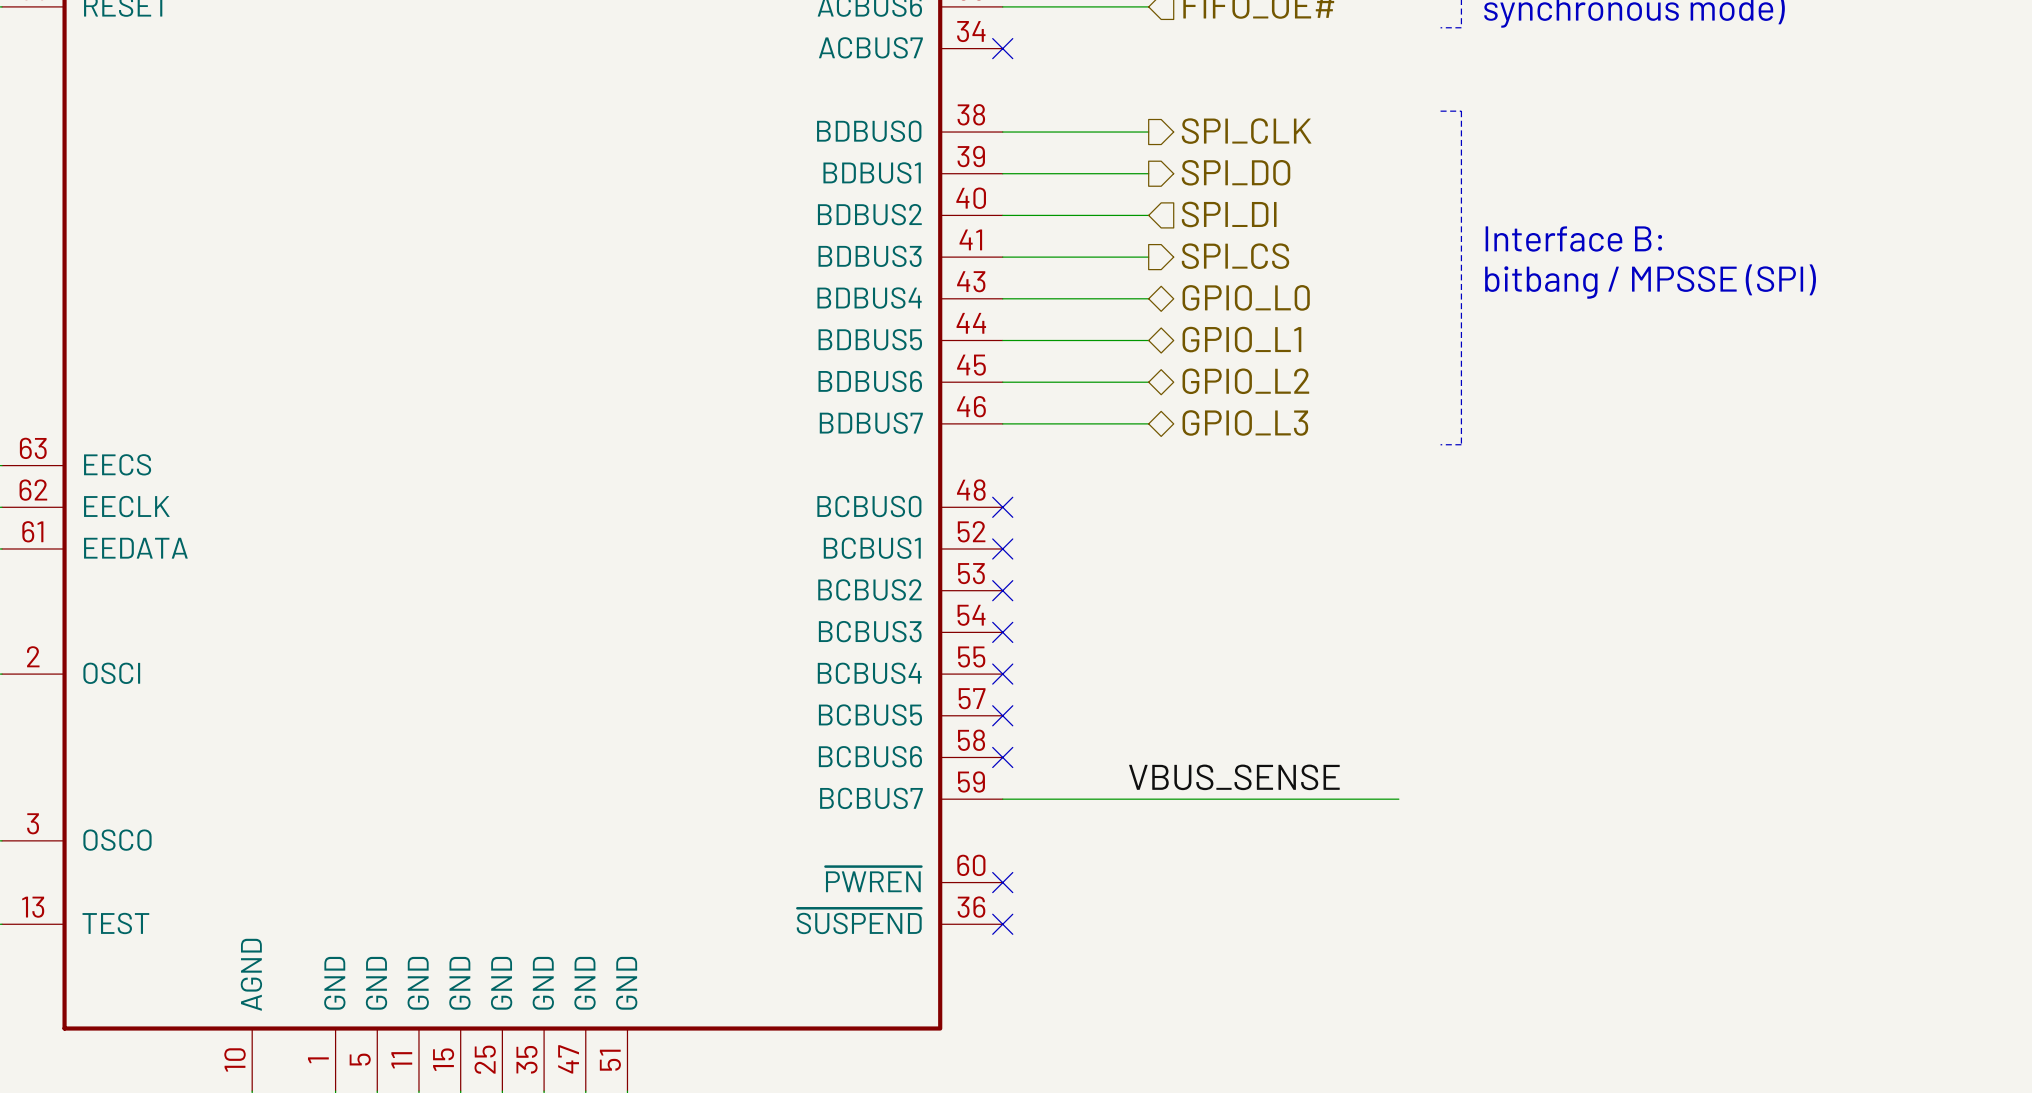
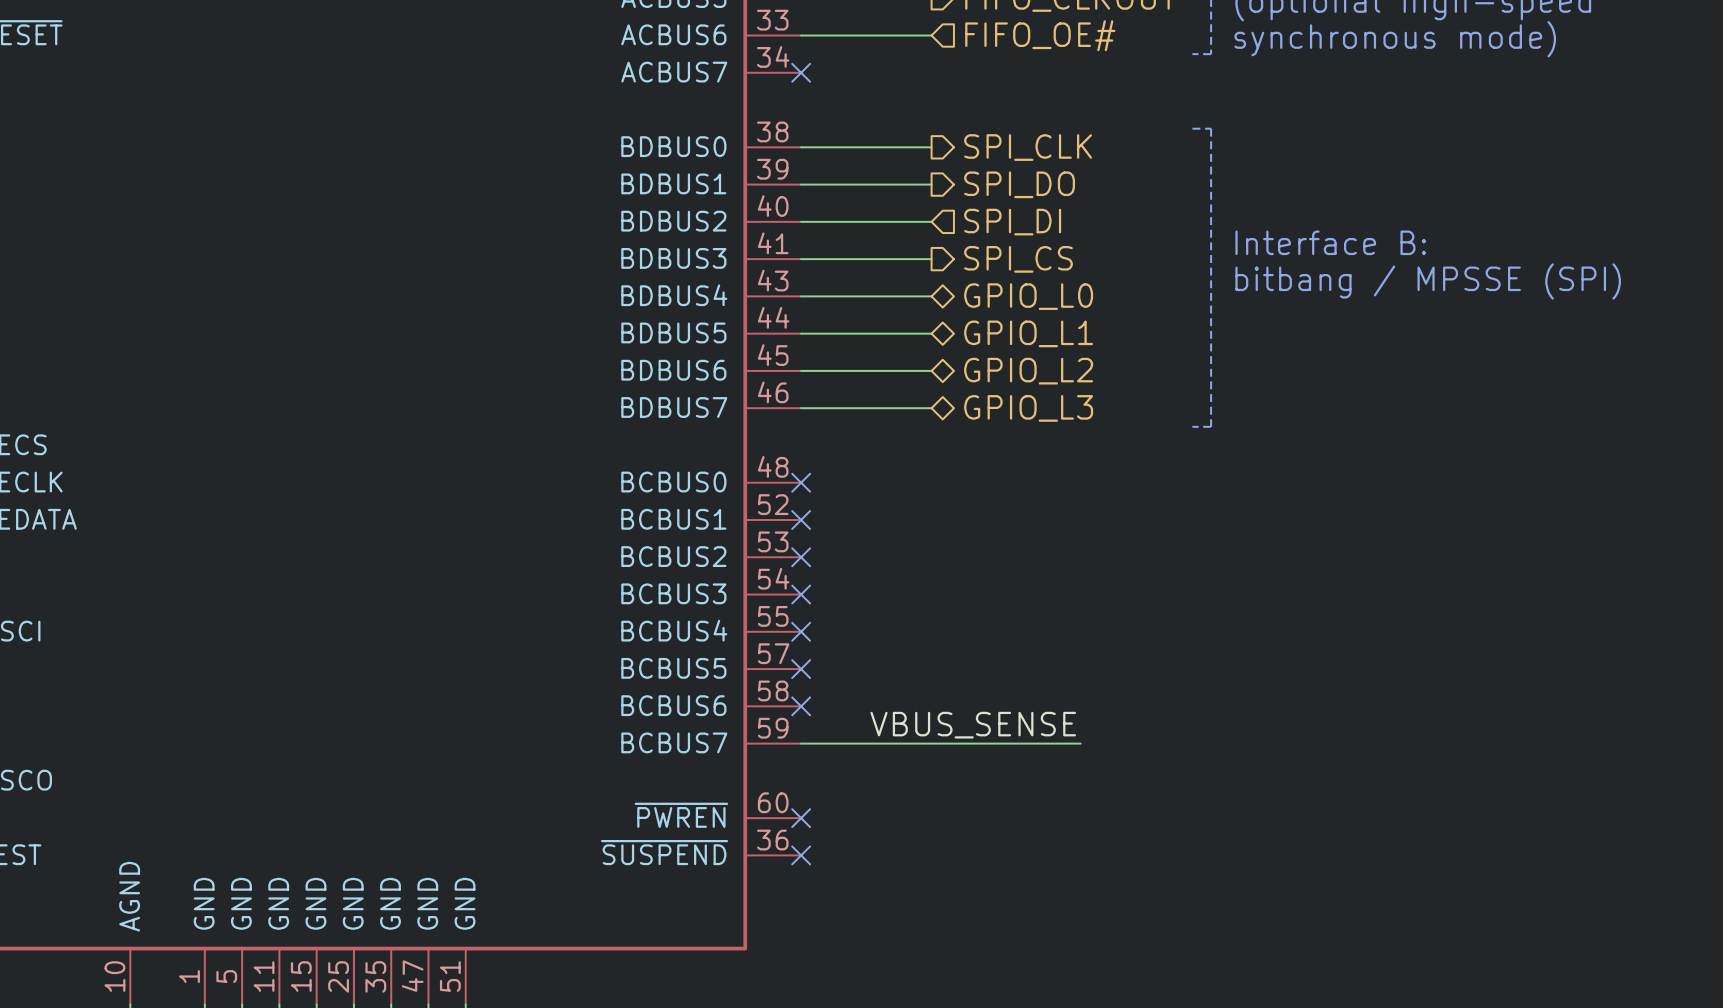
label position: VBUS_SENSE (1234, 777) -> VBUS_SENSE (973, 725)
wire: (1315, 799) (1398, 799) -> none

